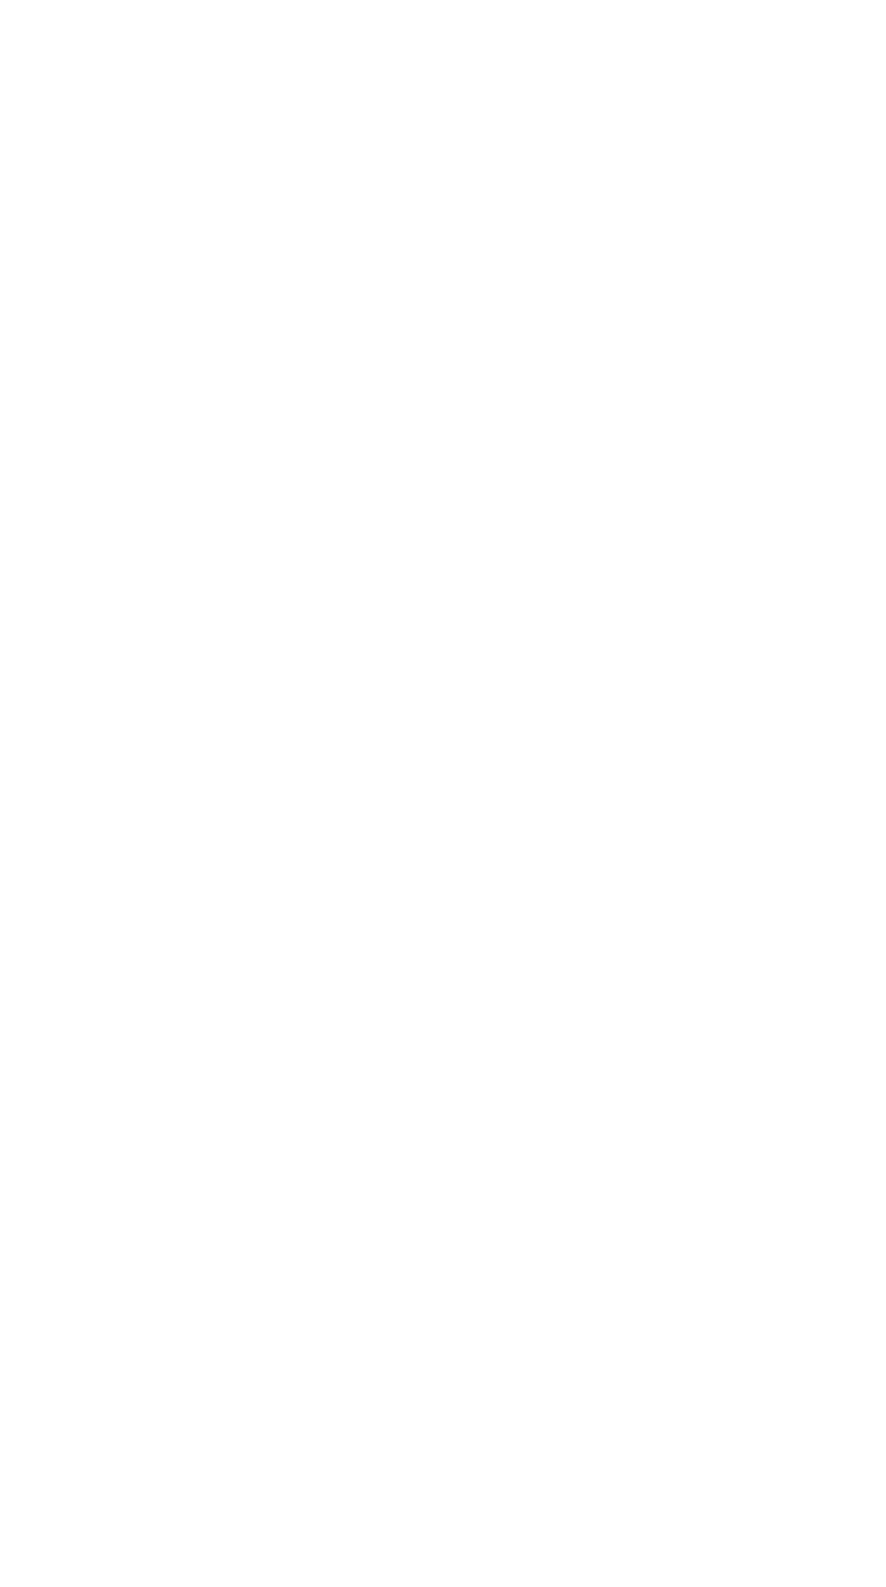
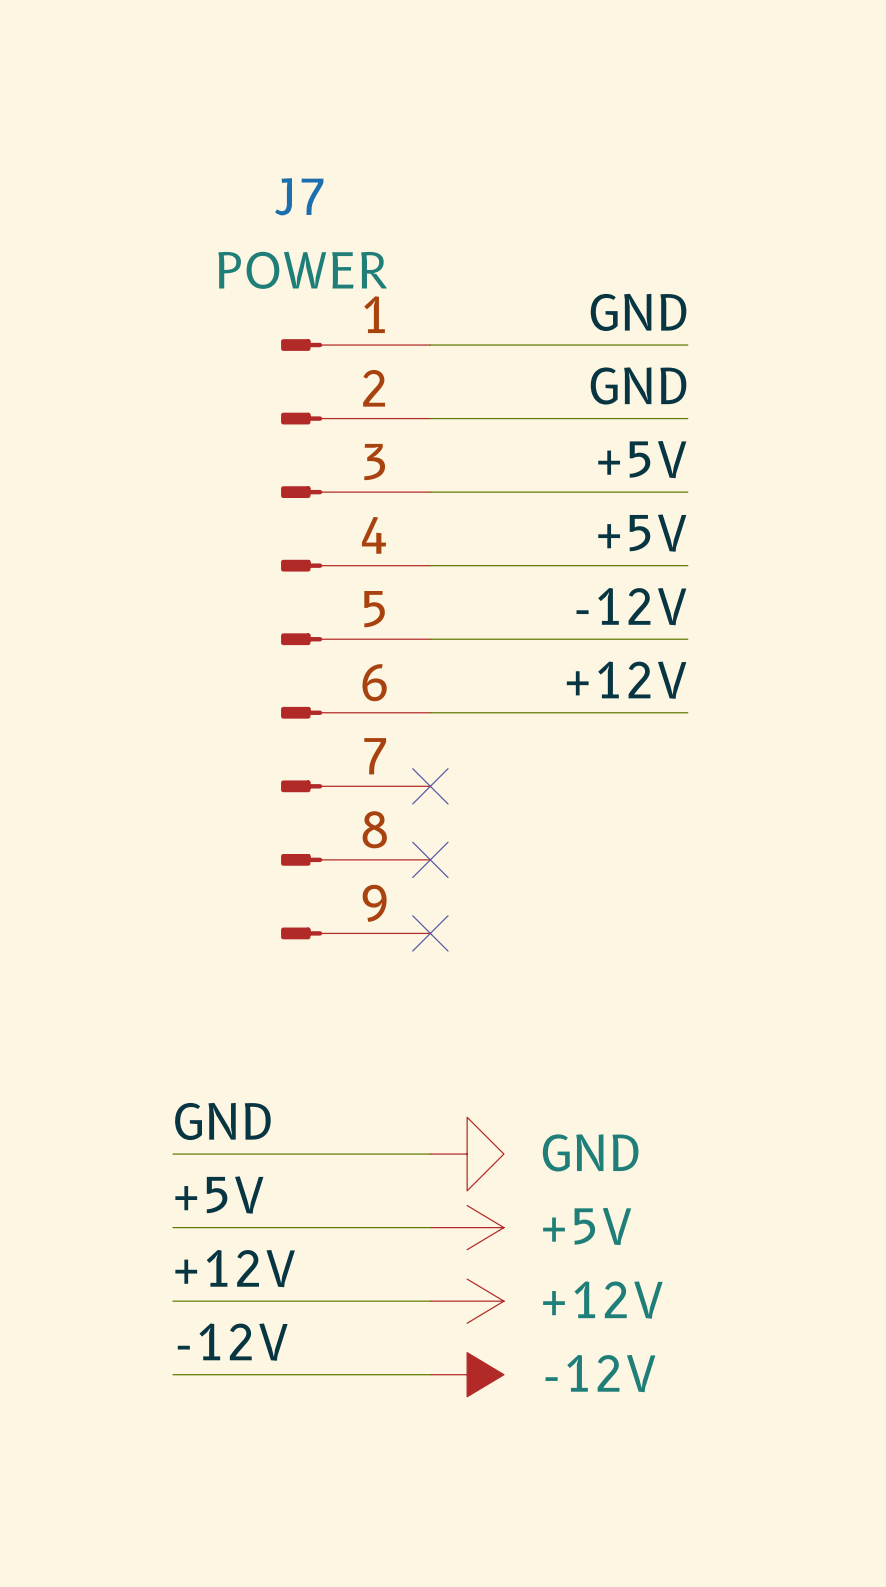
label: none -> GND (638, 312)
wire: none -> (430, 345) (687, 345)
label: none -> GND (638, 385)
wire: none -> (430, 418) (687, 418)
label: none -> +5V (642, 459)
wire: none -> (430, 492) (687, 492)
label: none -> +5V (642, 533)
wire: none -> (430, 565) (687, 565)
label: none -> -12V (631, 606)
J7: none -> POWER (355, 639)
wire: none -> (430, 639) (687, 639)
label: none -> +12V (626, 680)
wire: none -> (430, 712) (687, 712)
no-connect mark: none -> (430, 786)
no-connect mark: none -> (430, 859)
no-connect mark: none -> (430, 933)
label: none -> GND (222, 1121)
wire: none -> (172, 1154) (430, 1154)
power symbol: none -> GND (467, 1154)
label: none -> +5V (219, 1195)
wire: none -> (172, 1227) (430, 1227)
power symbol: none -> +5V (467, 1227)
label: none -> +12V (235, 1268)
wire: none -> (172, 1301) (430, 1301)
power symbol: none -> +12V (467, 1301)
label: none -> -12V (232, 1342)
wire: none -> (172, 1374) (430, 1374)
power symbol: none -> -12V (467, 1374)

